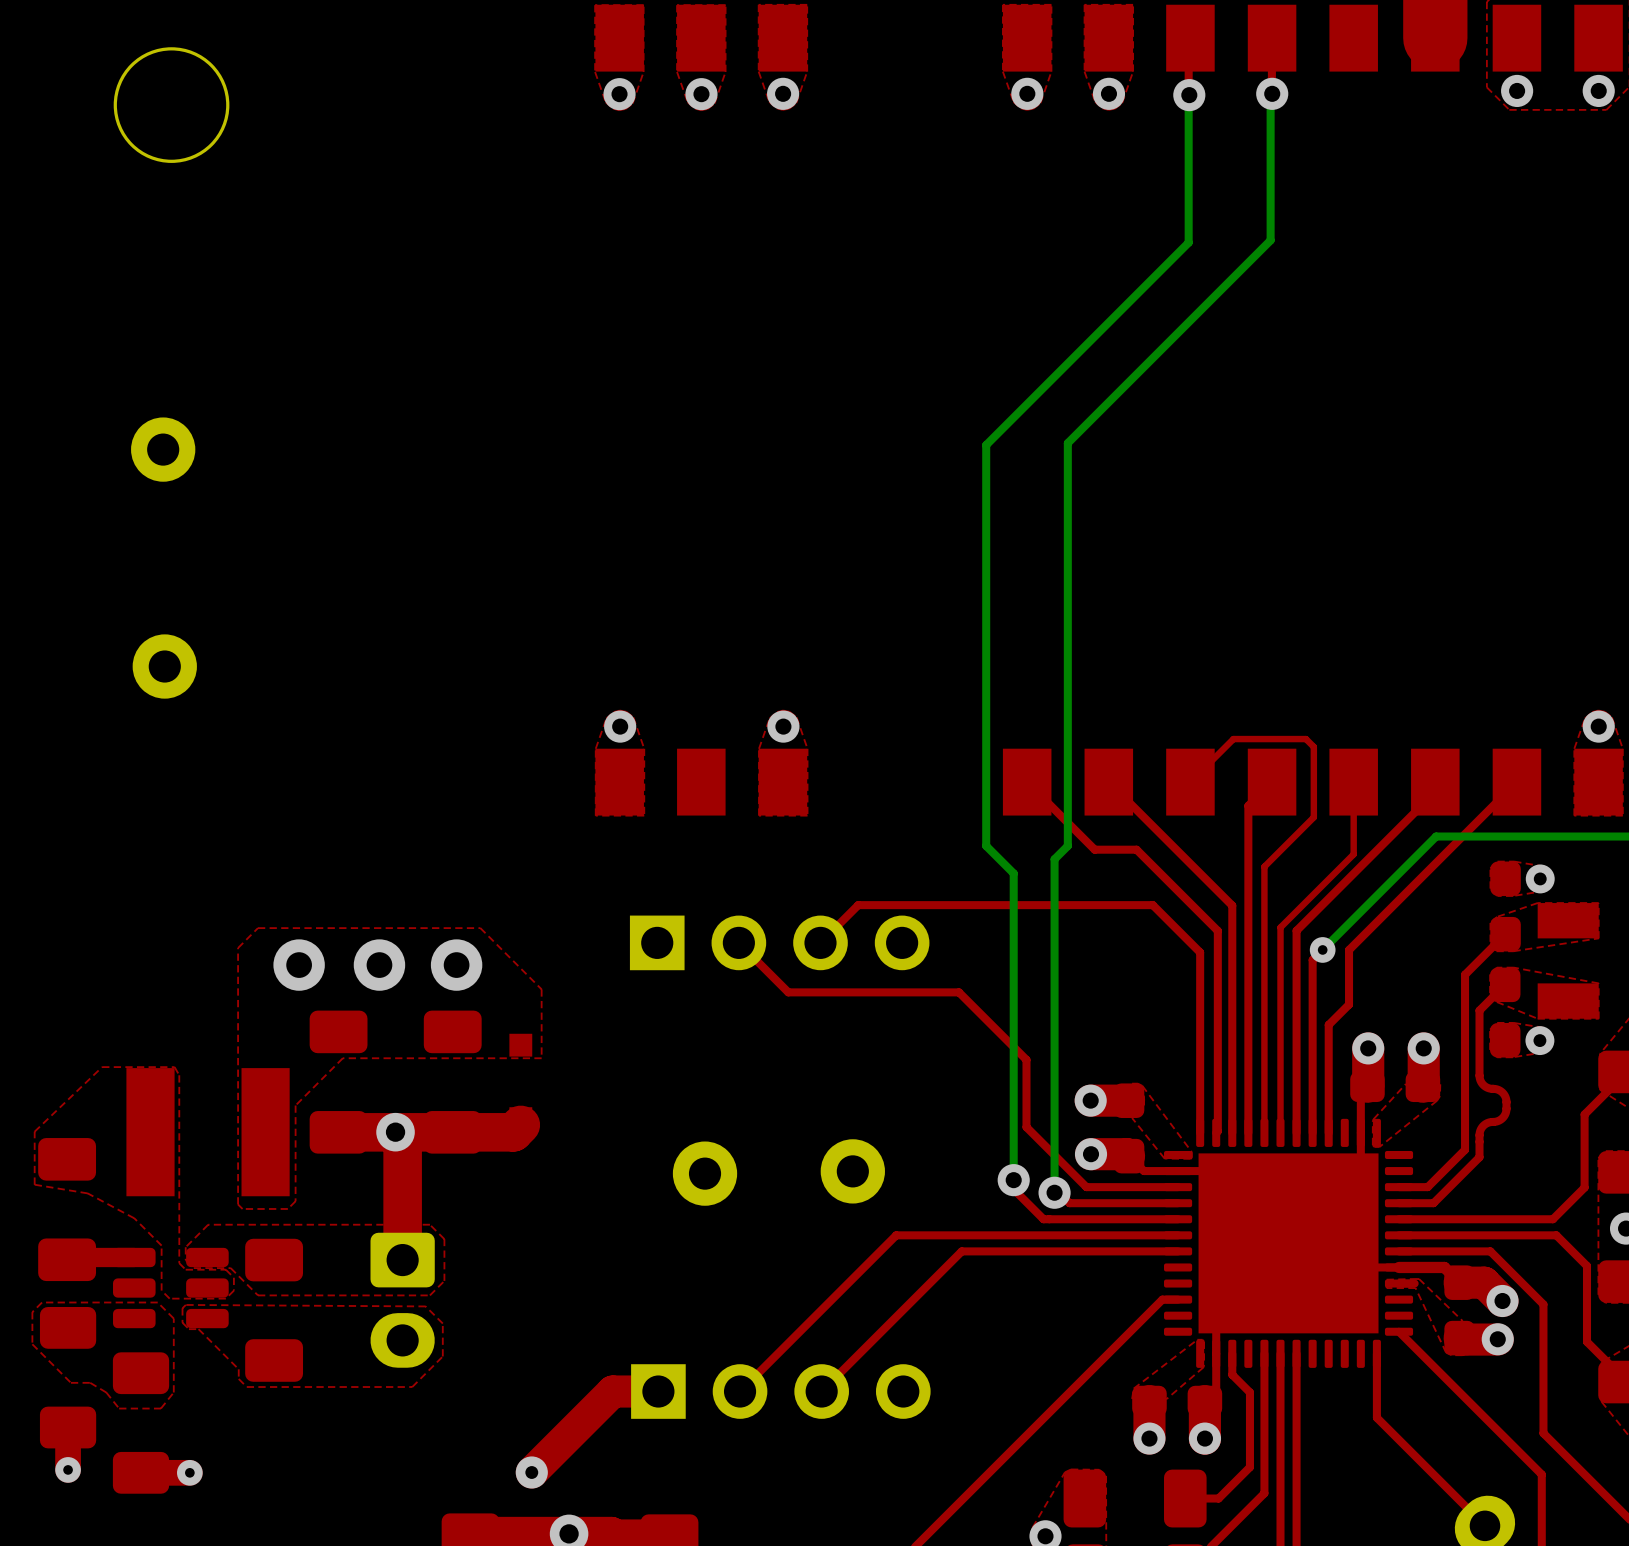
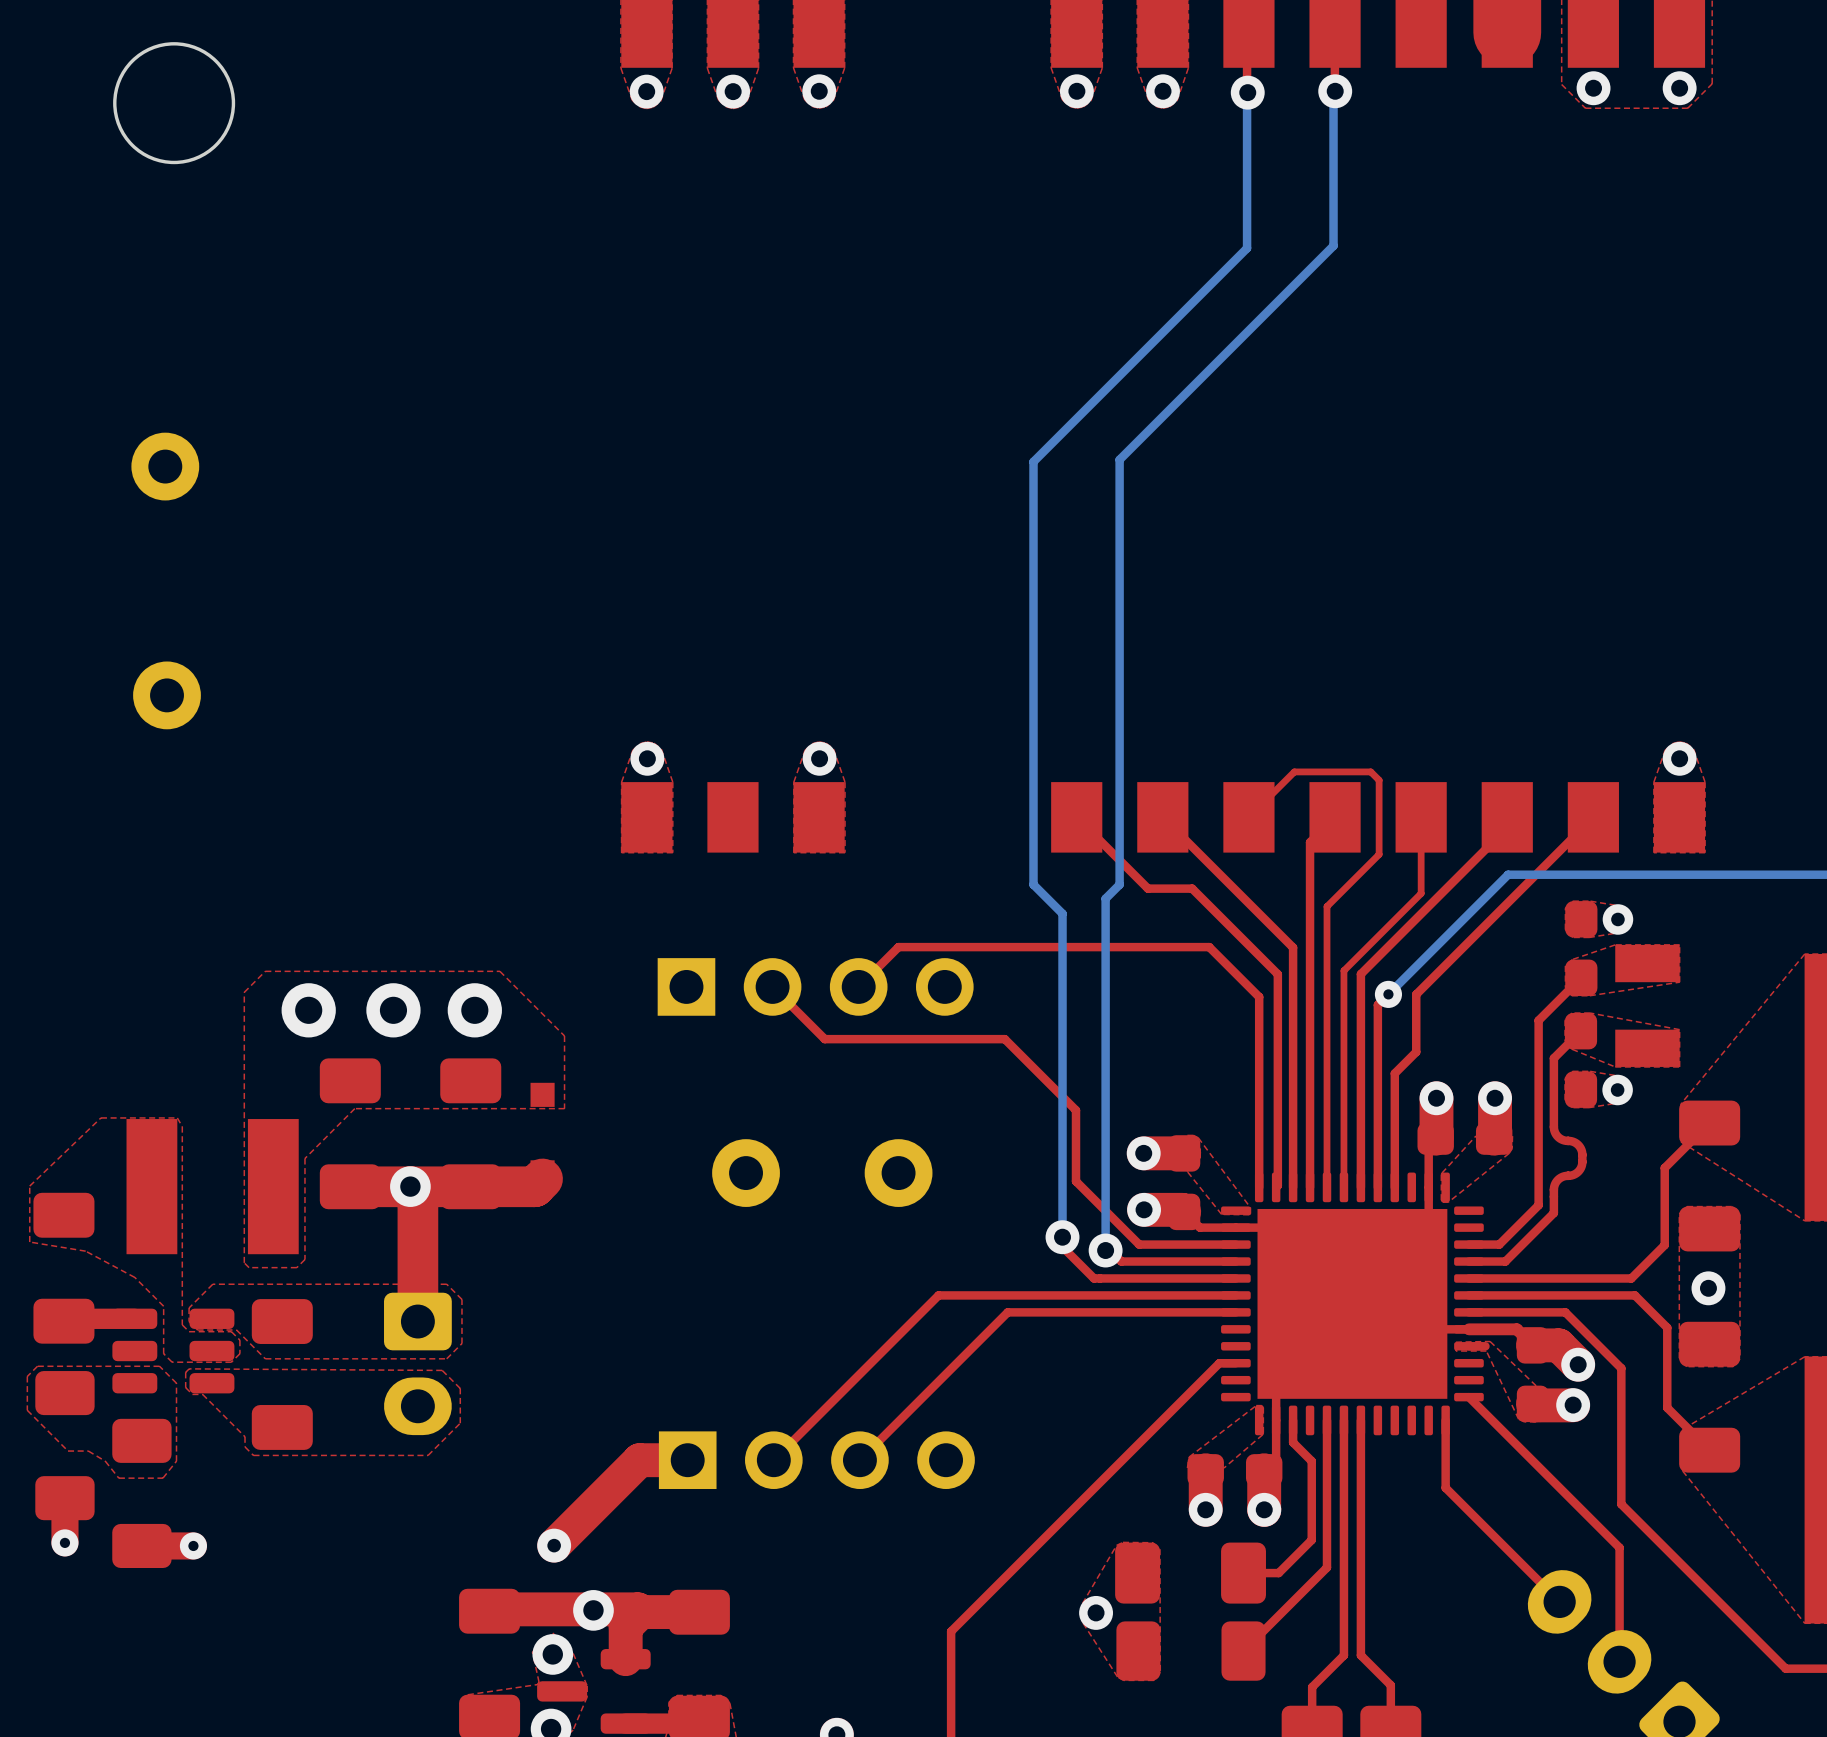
part position: (852, 1171) -> (898, 1173)
part position: (705, 1173) -> (746, 1173)

